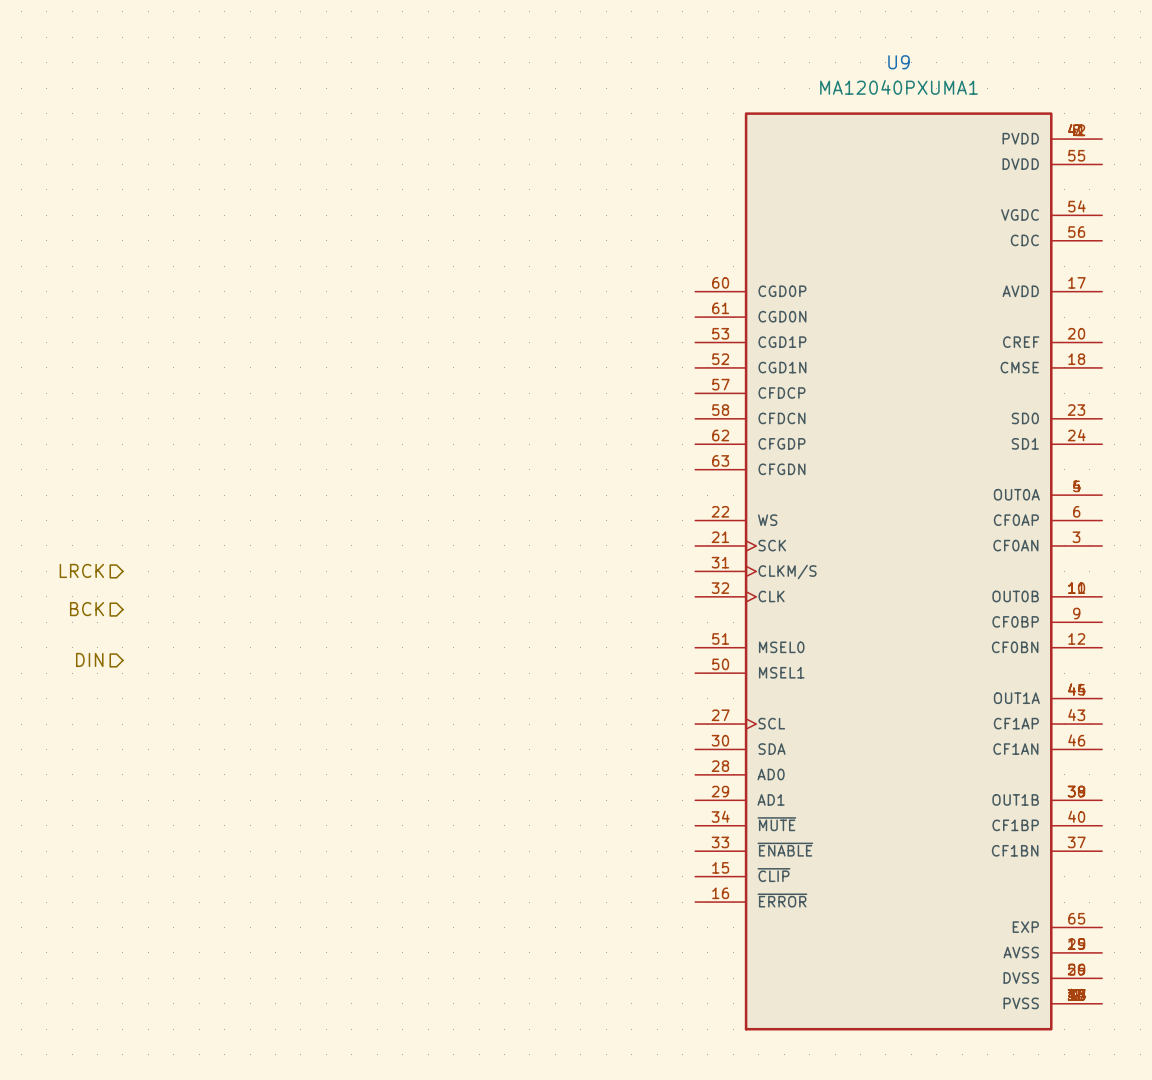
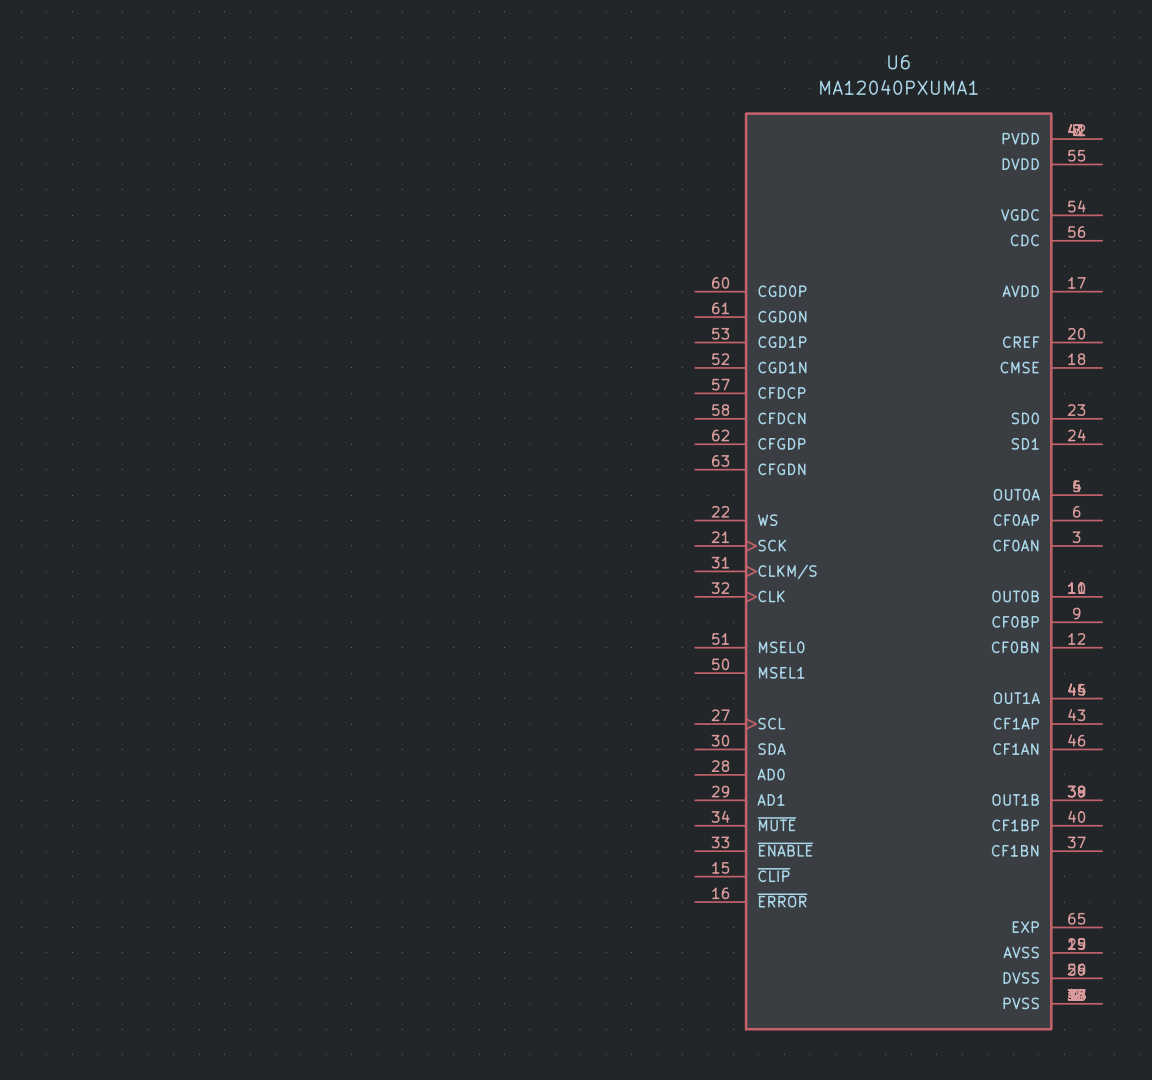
U9 name: U9 (898, 62) -> U6 (898, 62)
hierarchical label: LRCK (81, 570) -> none
hierarchical label: BCK (87, 609) -> none
hierarchical label: DIN (89, 659) -> none

